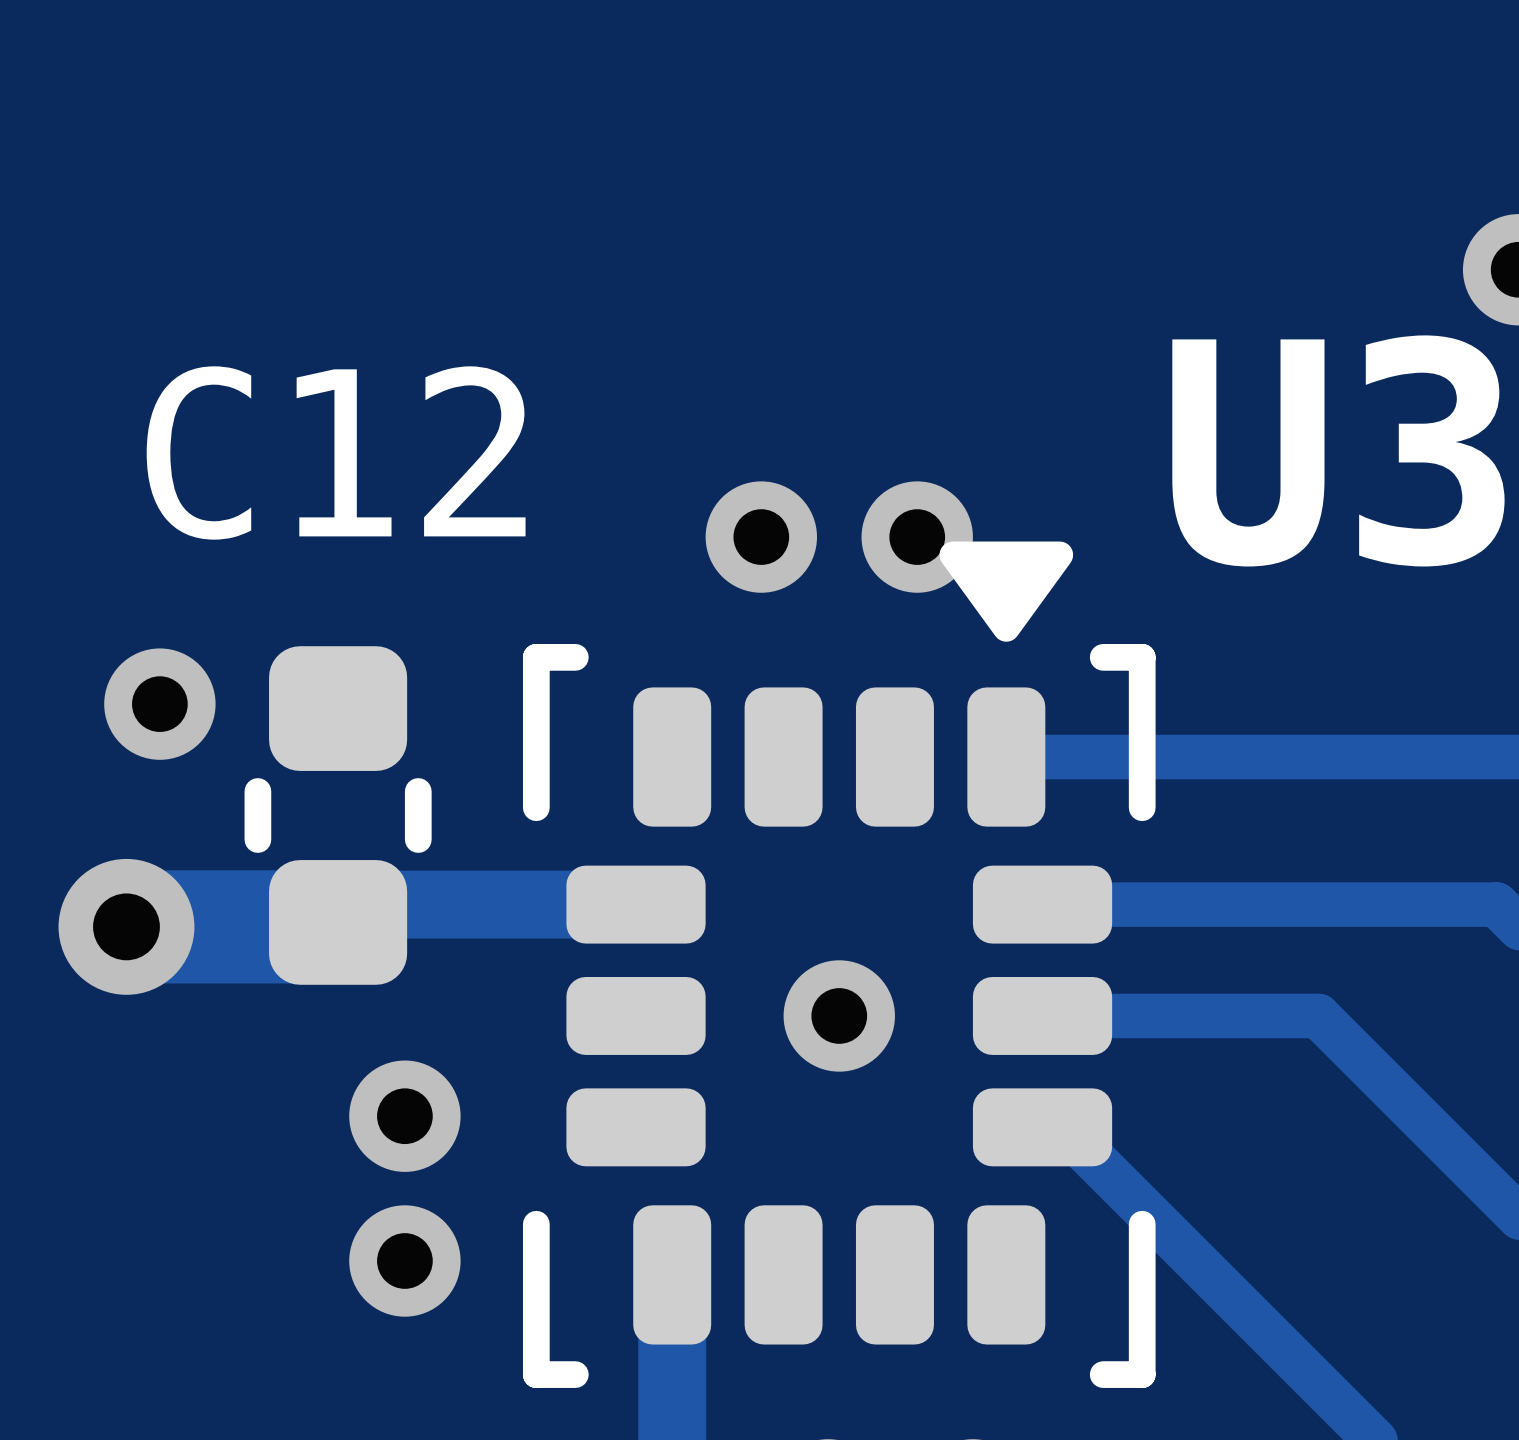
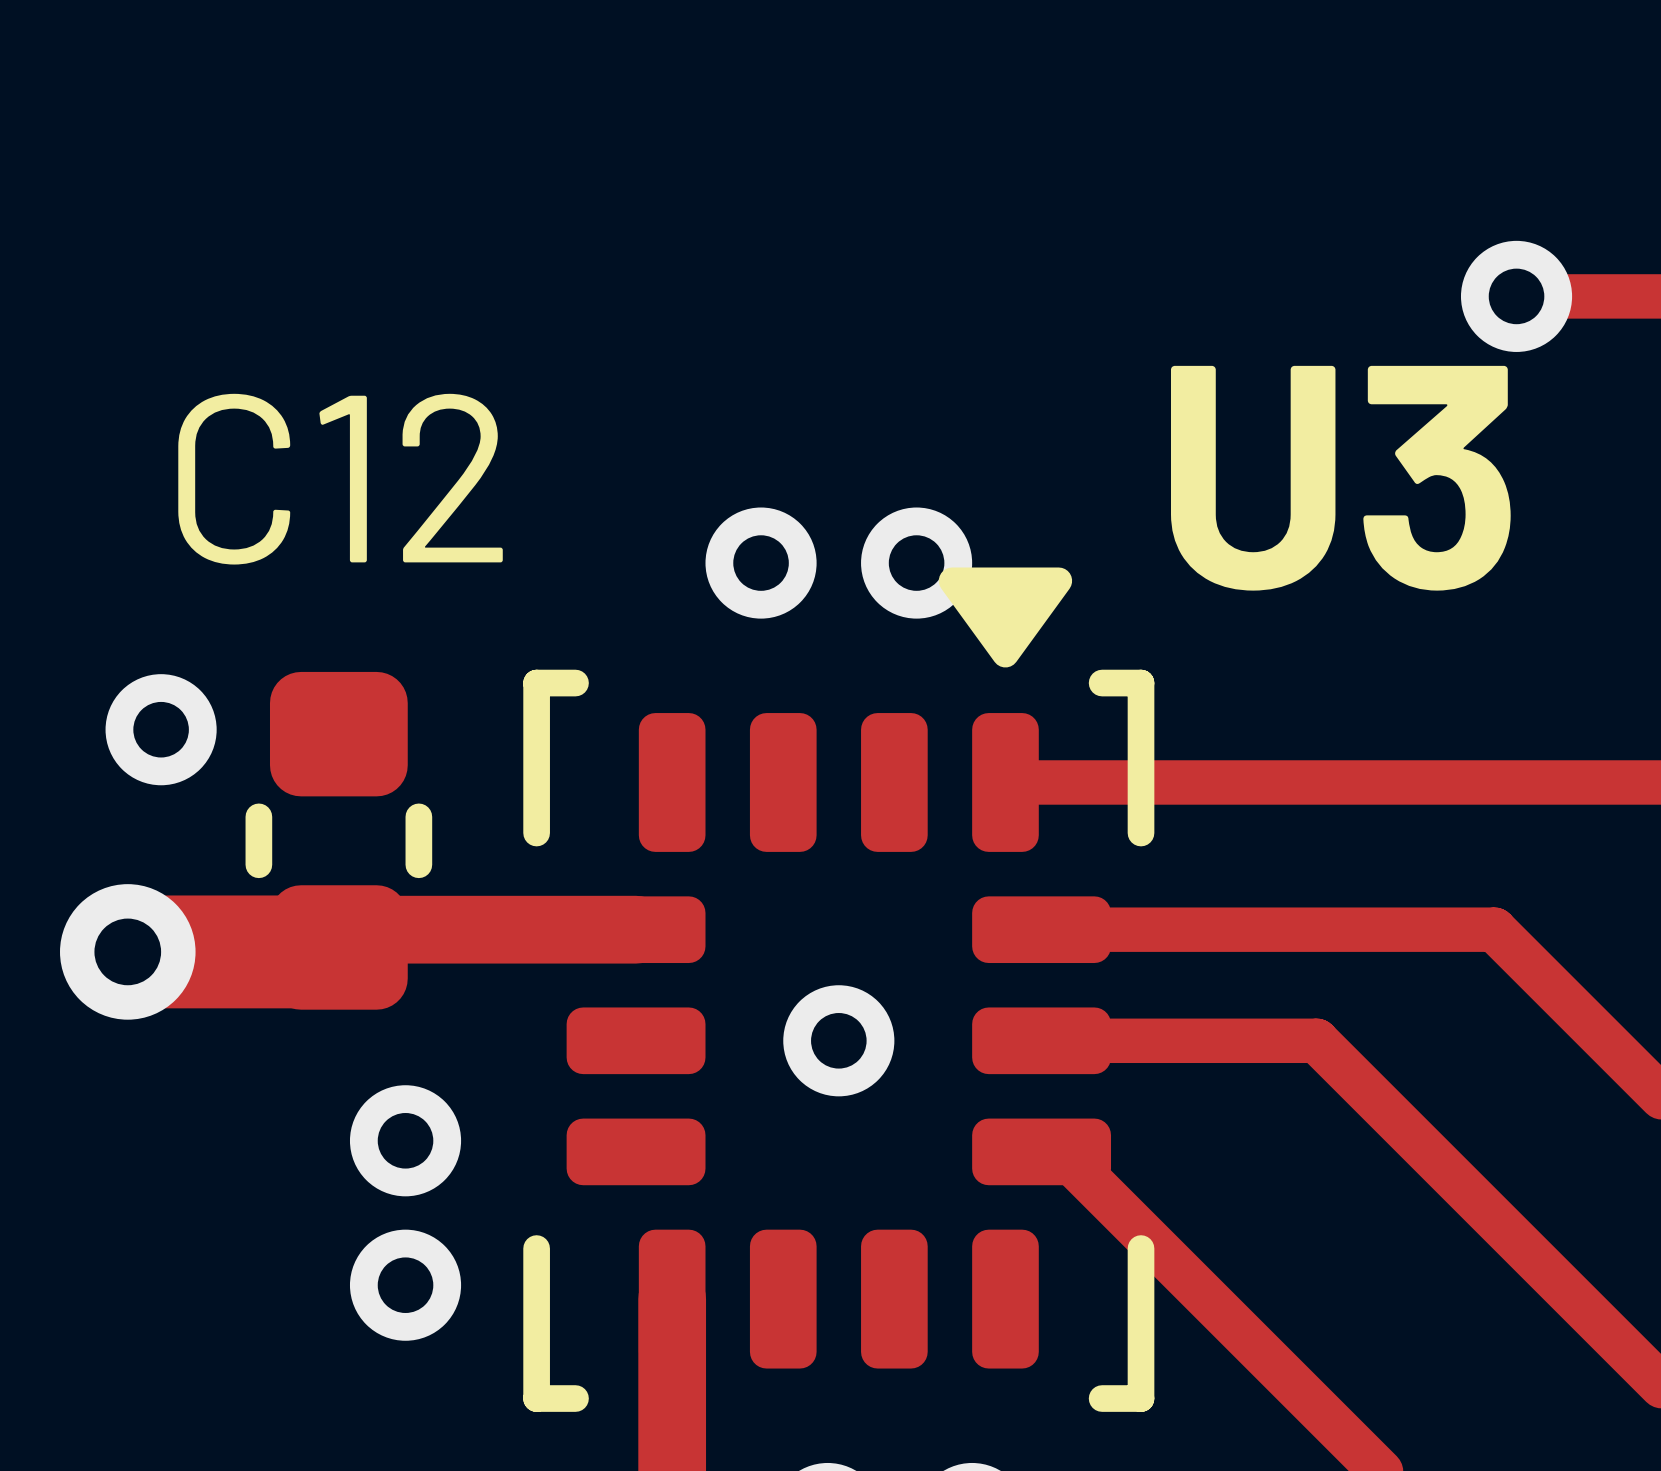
U3 footprint: [522, 541, 1156, 1388] -> [523, 567, 1155, 1412]

